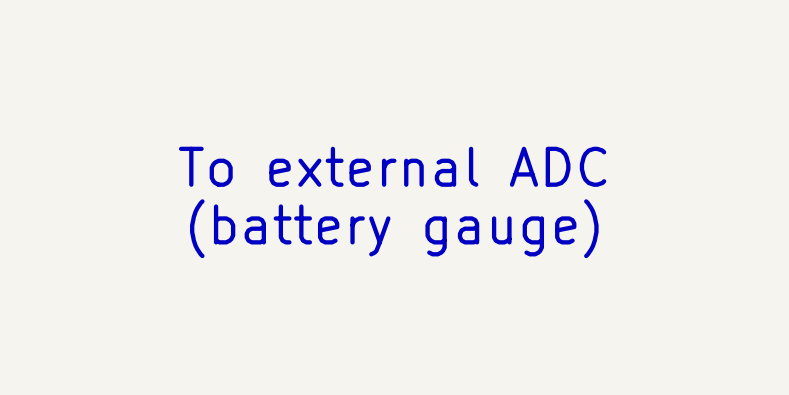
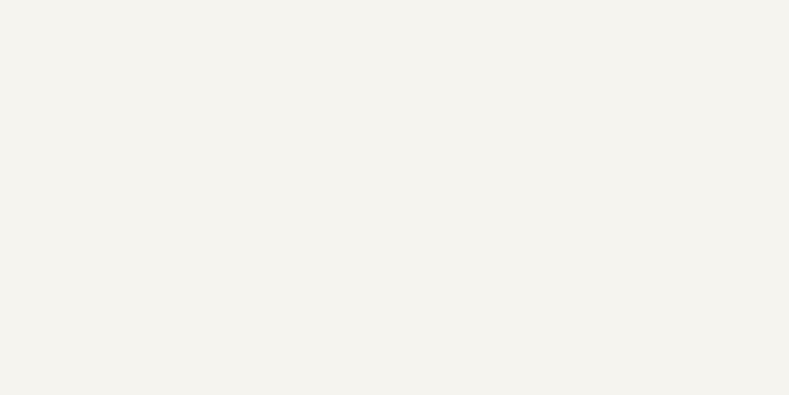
text: To external ADC (392, 166) -> none
text: (battery gauge) (394, 228) -> none

